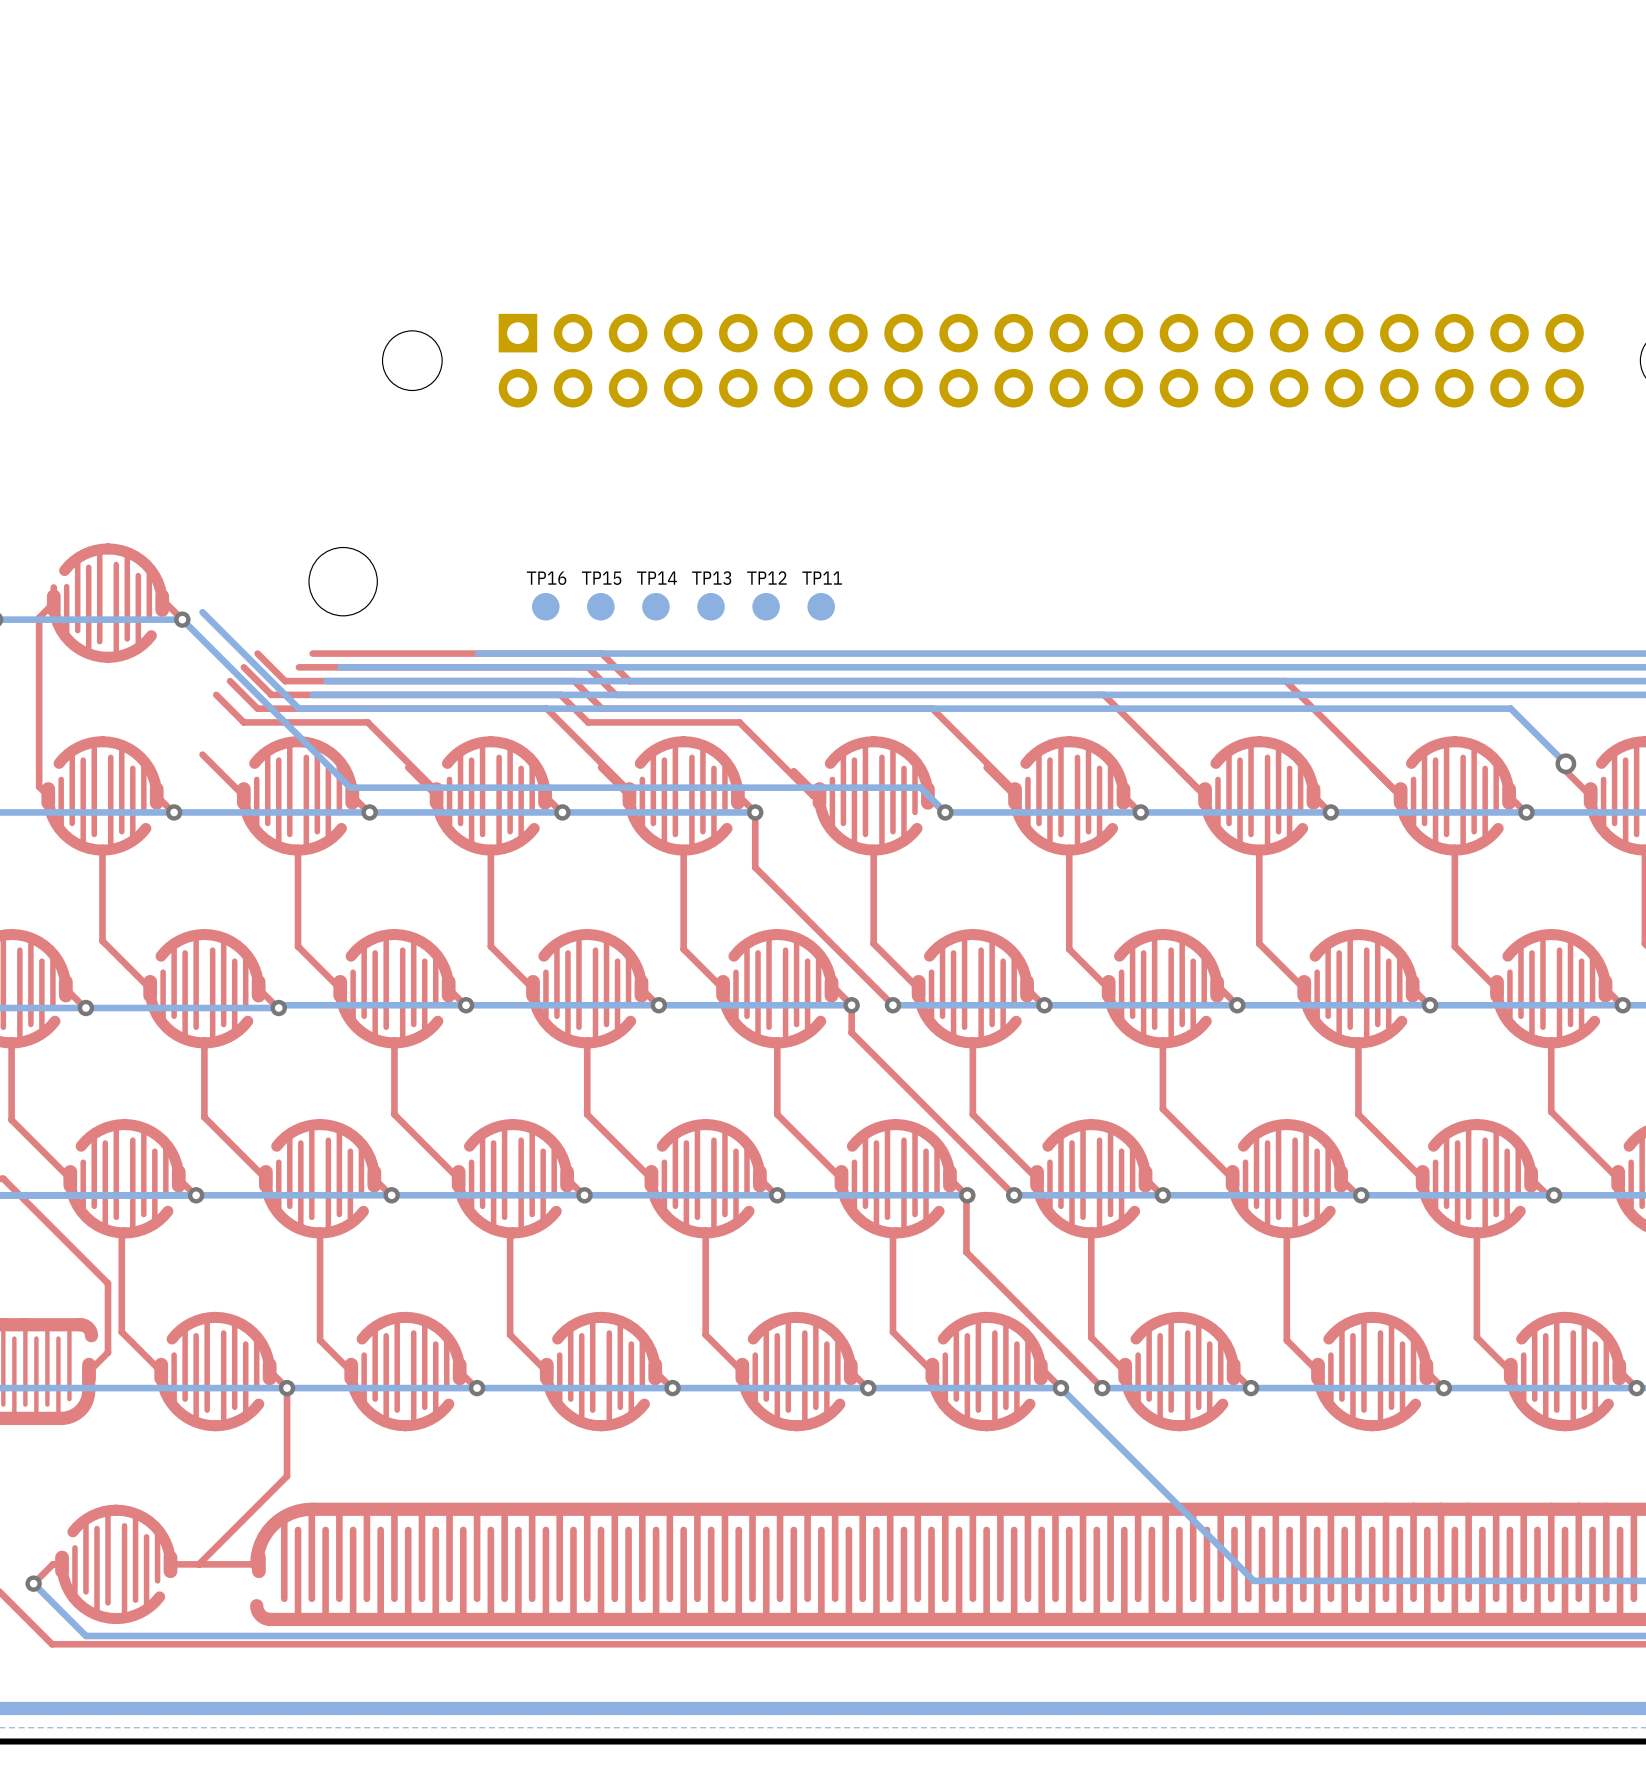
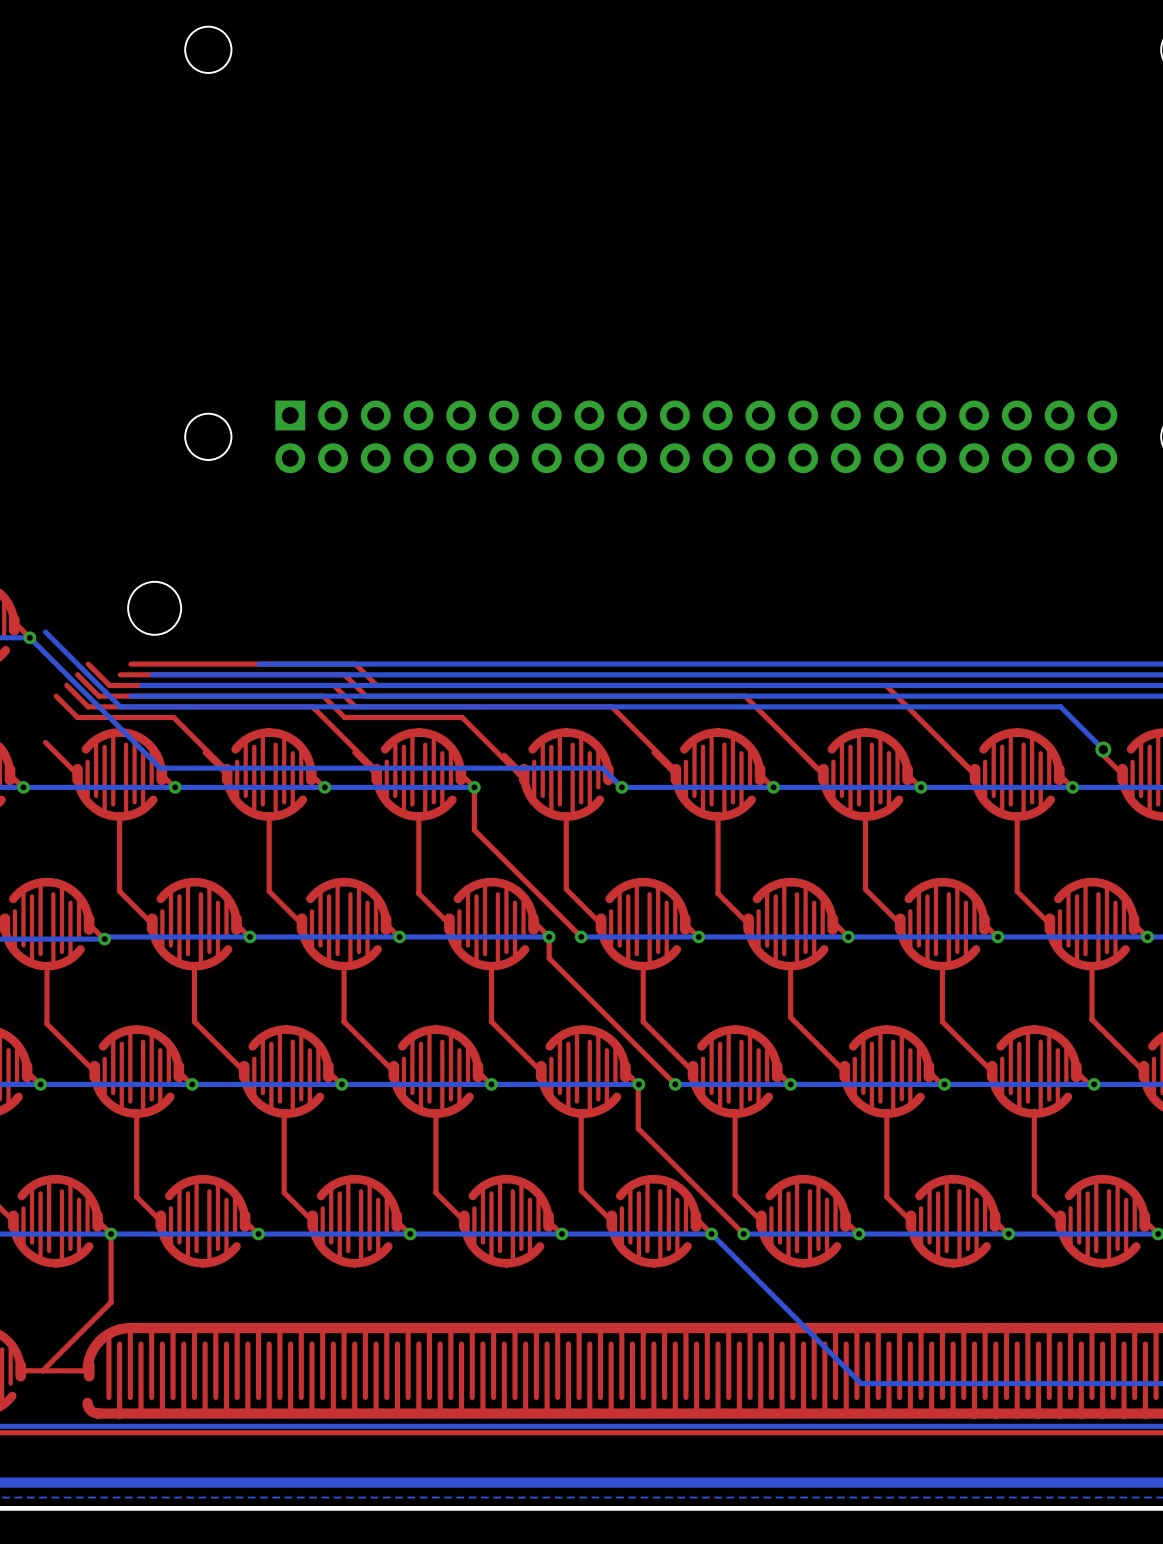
TP16: (545, 606) -> none
TP15: (600, 606) -> none
TP14: (655, 606) -> none
TP13: (711, 606) -> none
TP12: (766, 606) -> none
TP11: (821, 606) -> none

